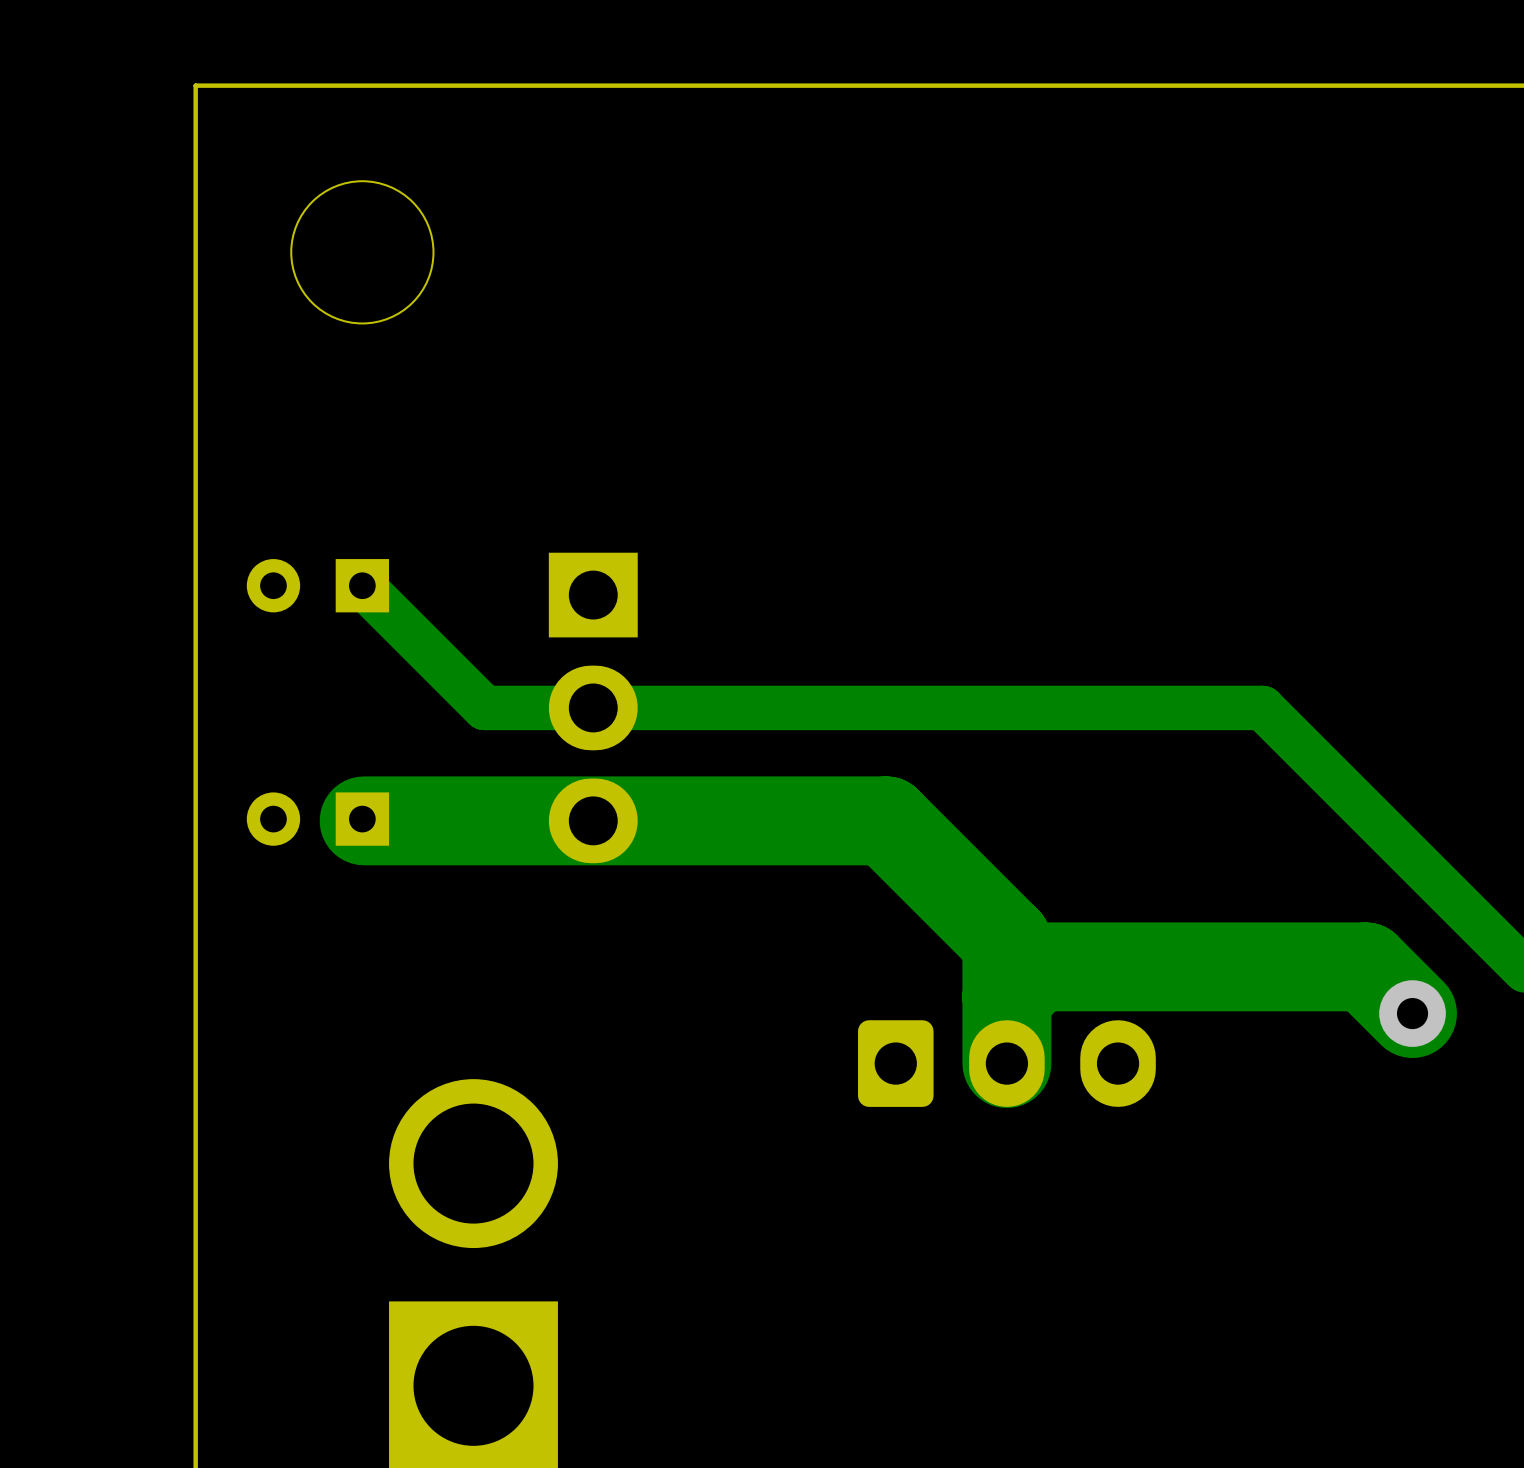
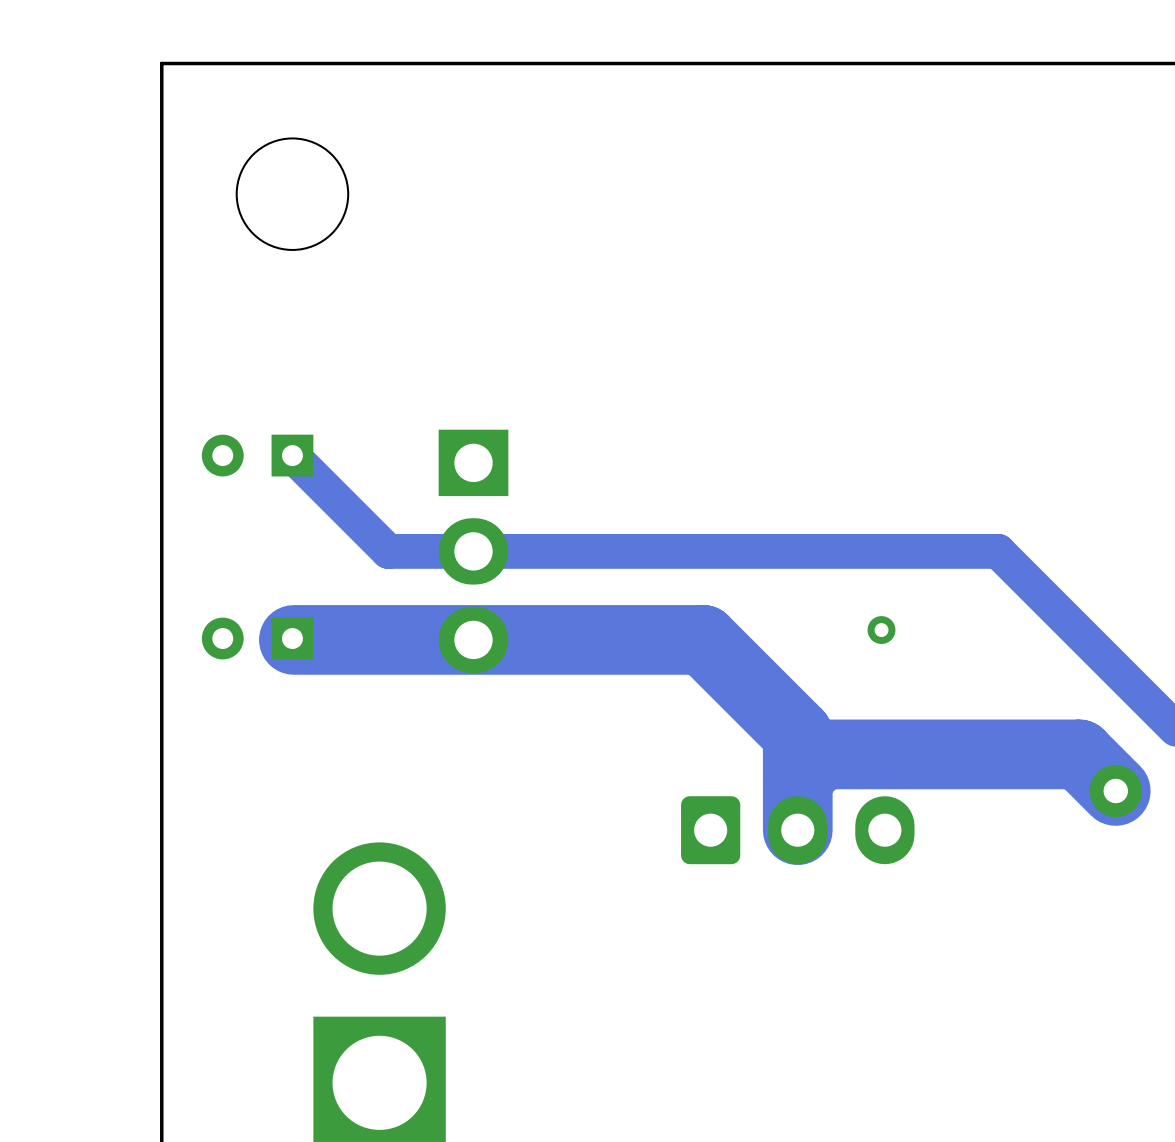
via: none -> (881, 630)

